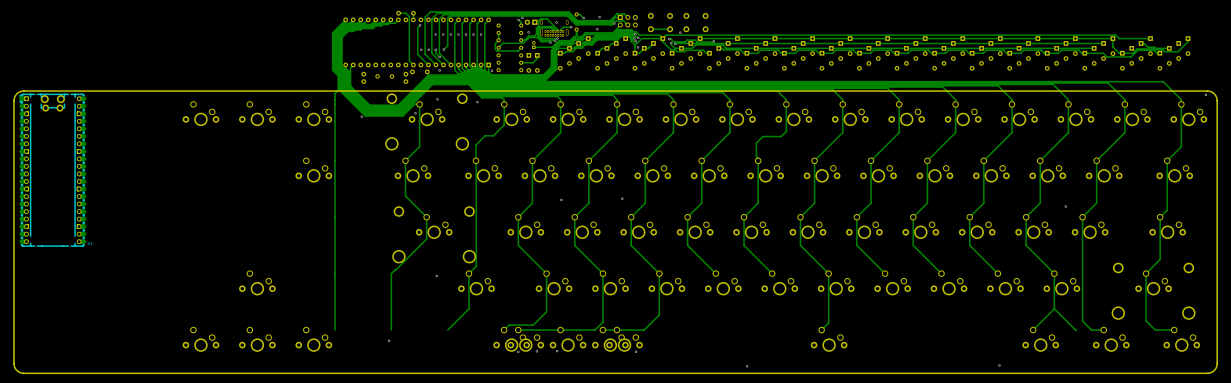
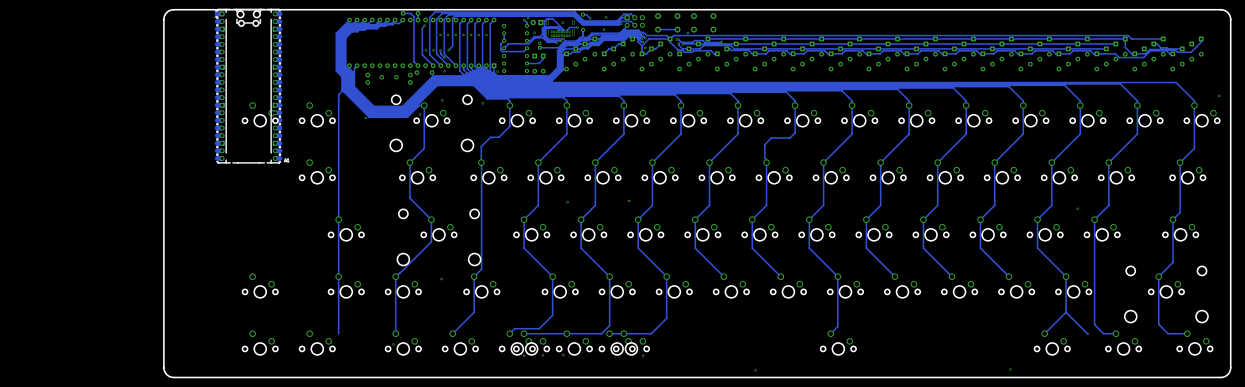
board edge: (13, 100) (13, 363) (16, 370) (23, 373) -> none
board edge: (1217, 100) (1214, 93) (1207, 91) (23, 91) (16, 93) (13, 100) -> (1230, 101) (1230, 18) (1227, 12) (1221, 9) (171, 9) (166, 13) (163, 19) (163, 367) (166, 374) (173, 377)
part: (200, 113) -> none
part position: (52, 170) -> (248, 86)
part: none -> (346, 228)
part: none -> (346, 285)
part: none -> (403, 285)
part: (200, 338) -> none
part: none -> (403, 342)
part: none -> (460, 342)
board edge: (171, 373) (23, 373) -> none

